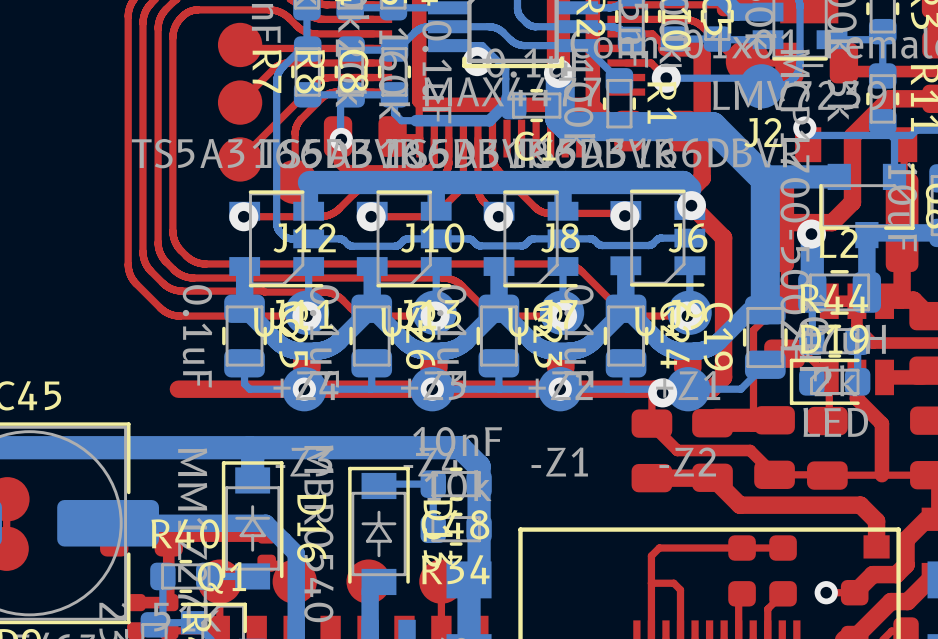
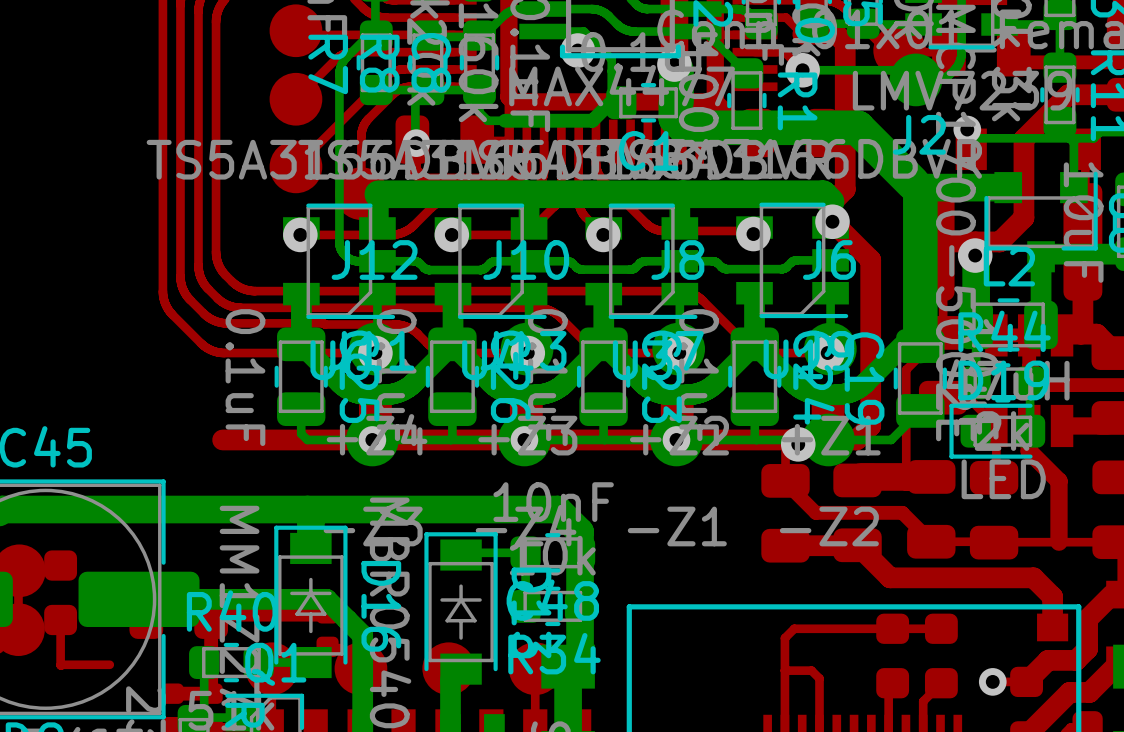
part: none -> (60, 592)
top track: none -> (60, 619) (60, 665)
top track: none -> (109, 664) (61, 665)

